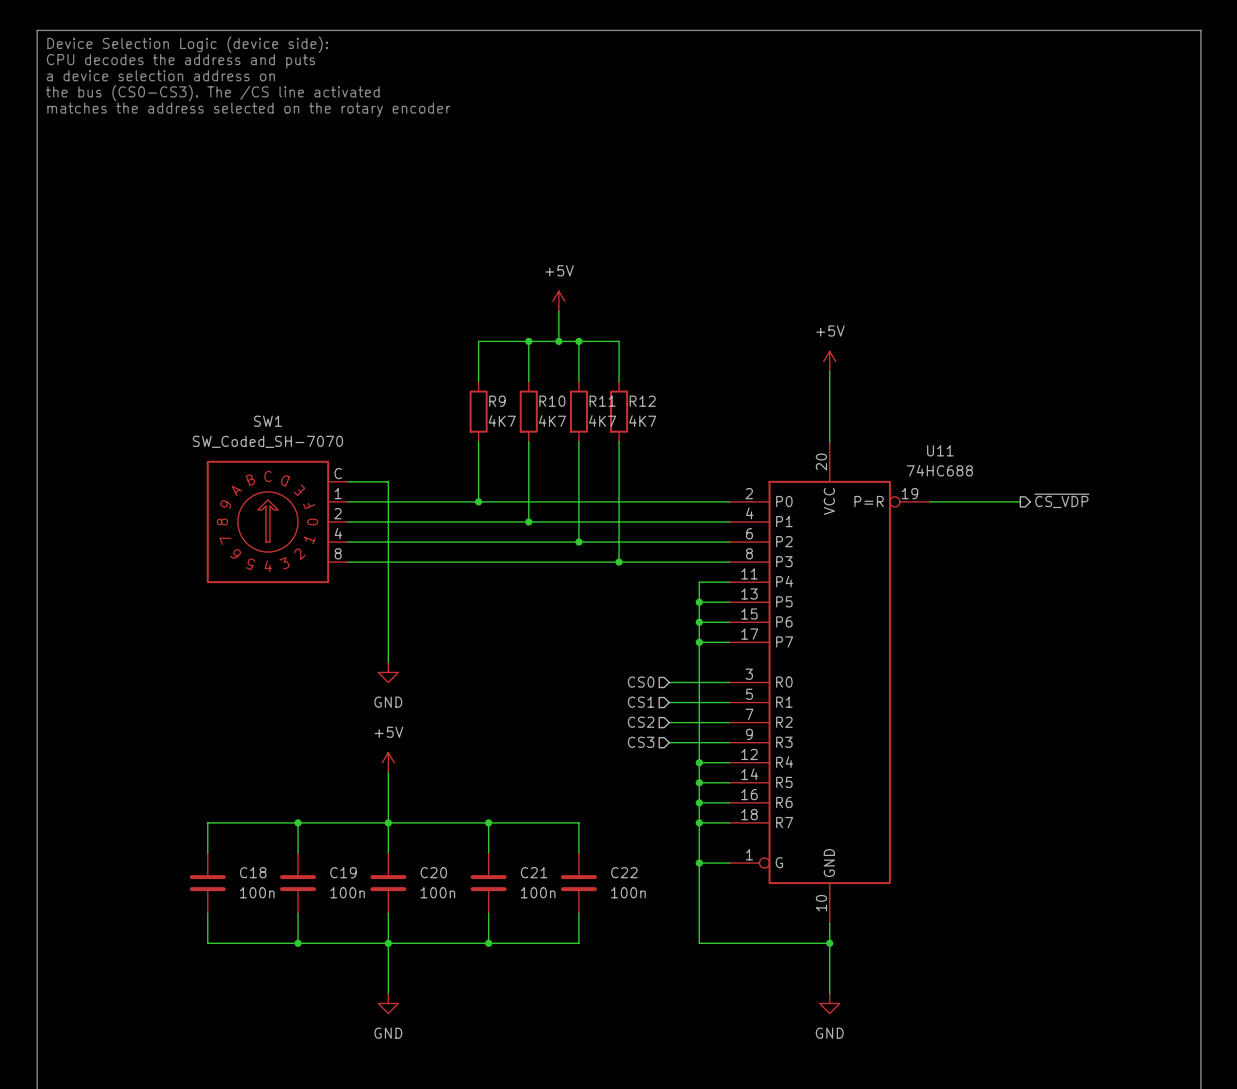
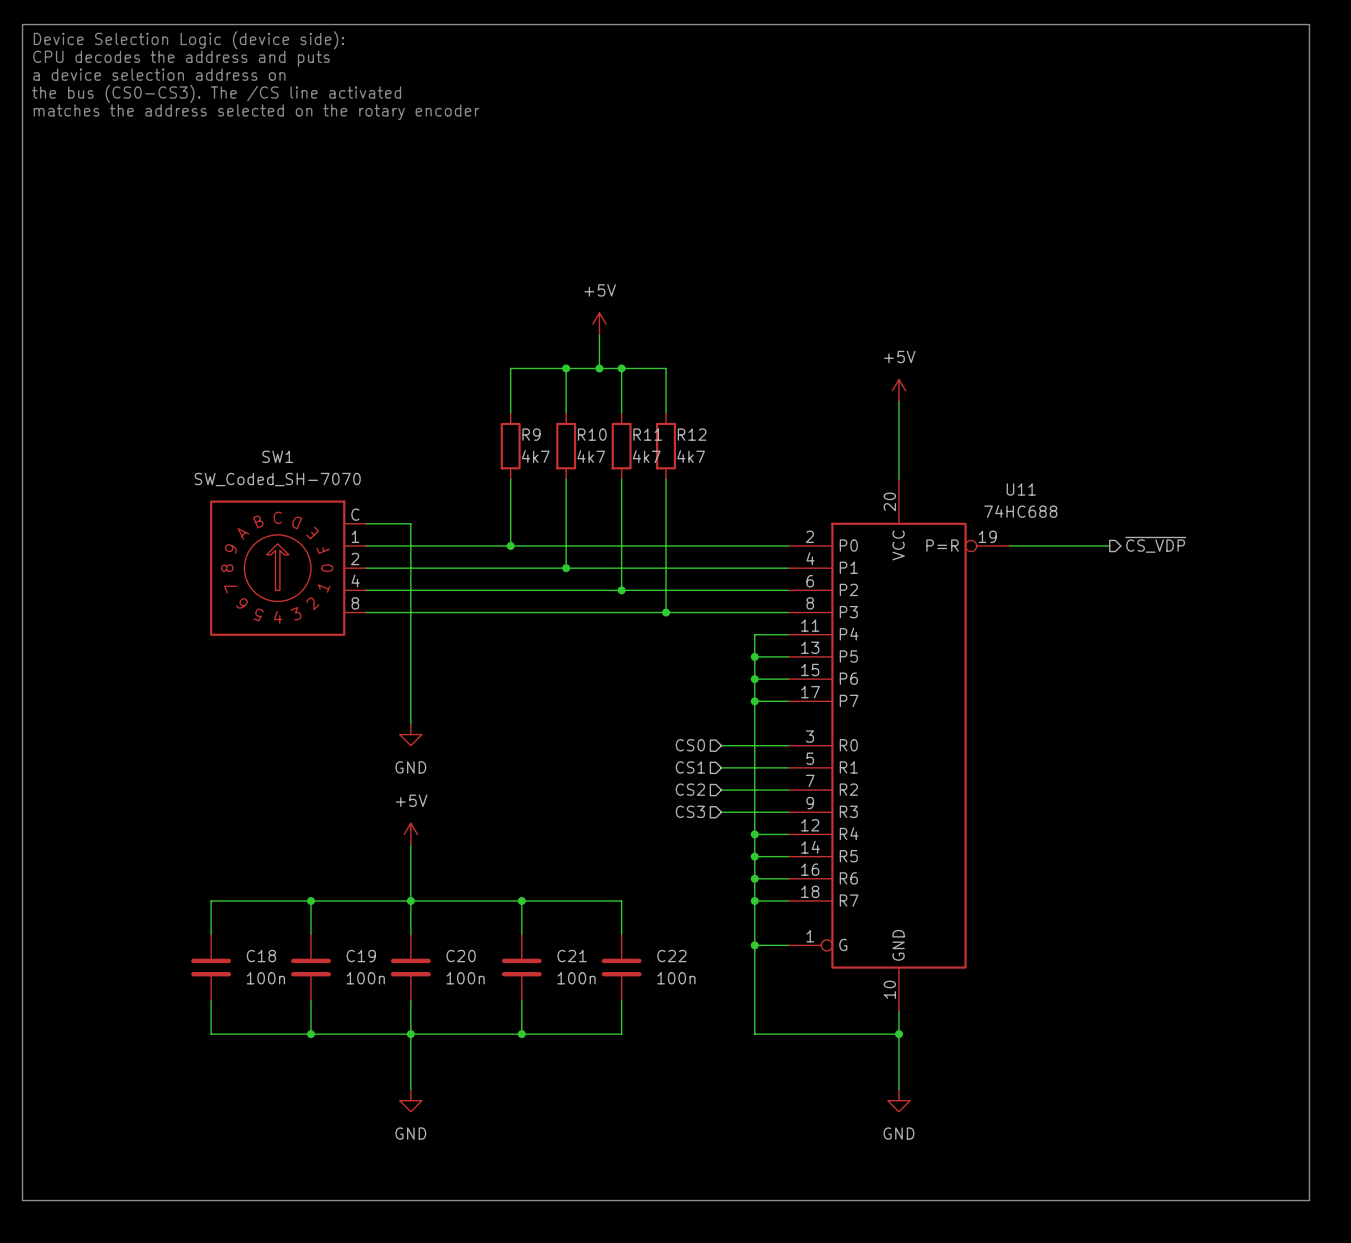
R9 value: 4K7 (502, 421) -> 4k7 (535, 456)
R10 value: 4K7 (552, 421) -> 4k7 (591, 456)
R11 value: 4K7 (602, 421) -> 4k7 (646, 456)
R12 value: 4K7 (642, 421) -> 4k7 (691, 456)

